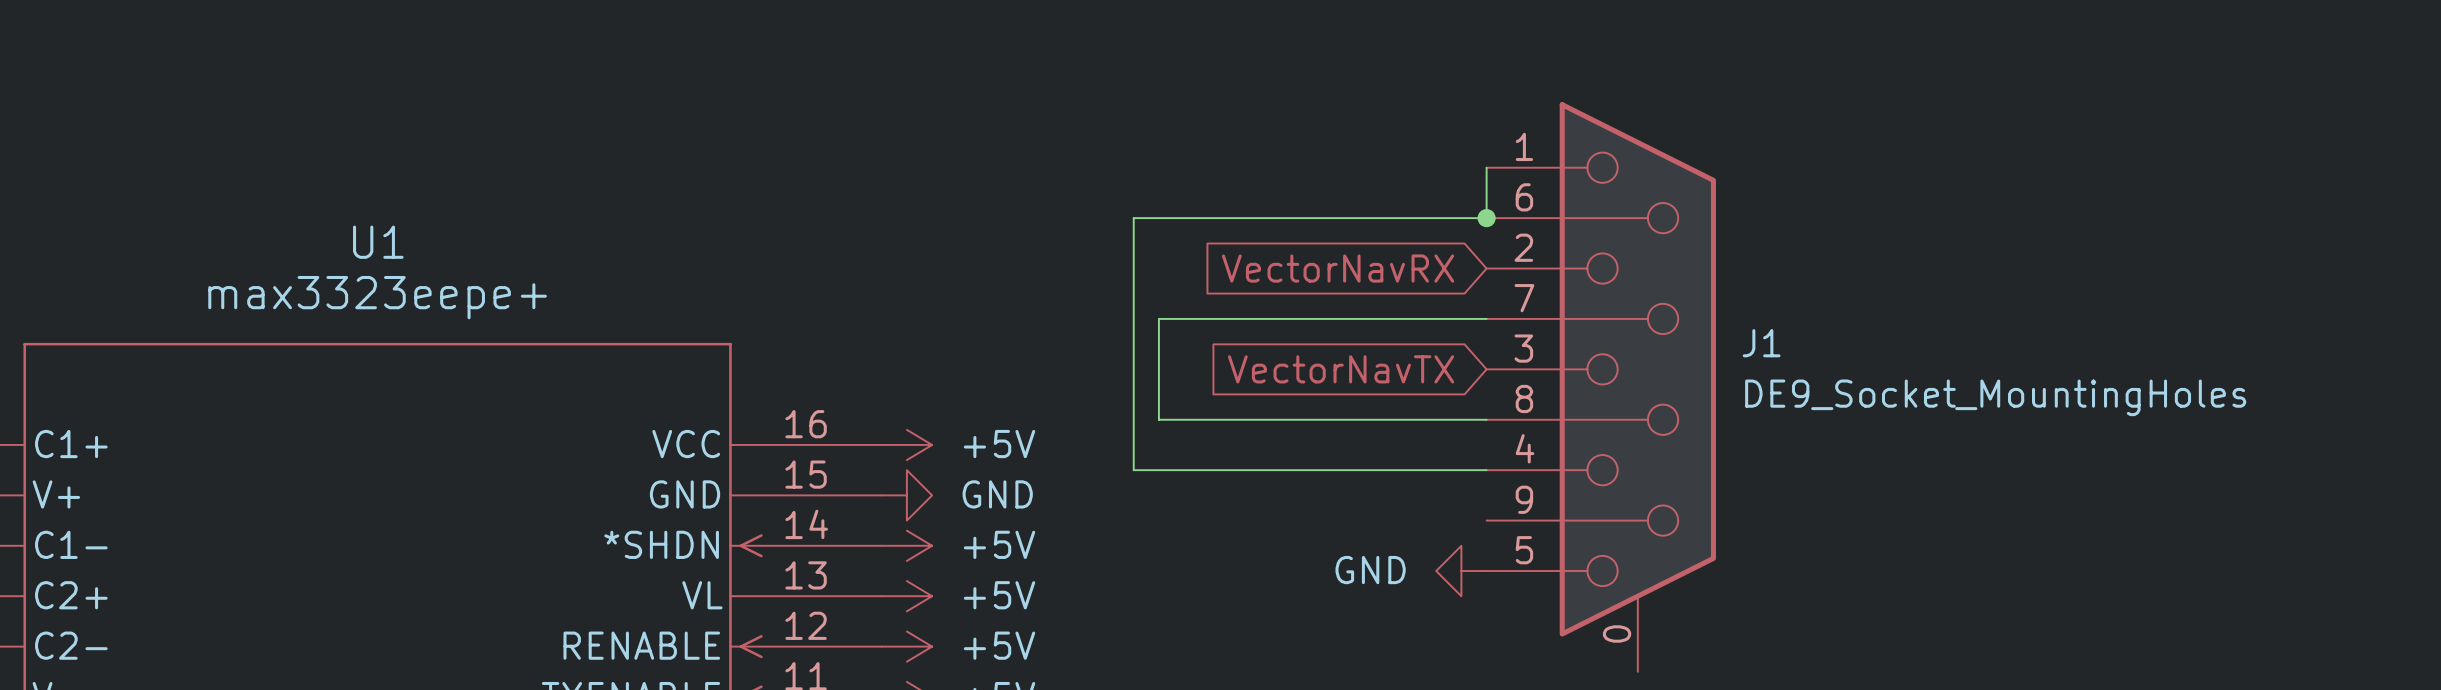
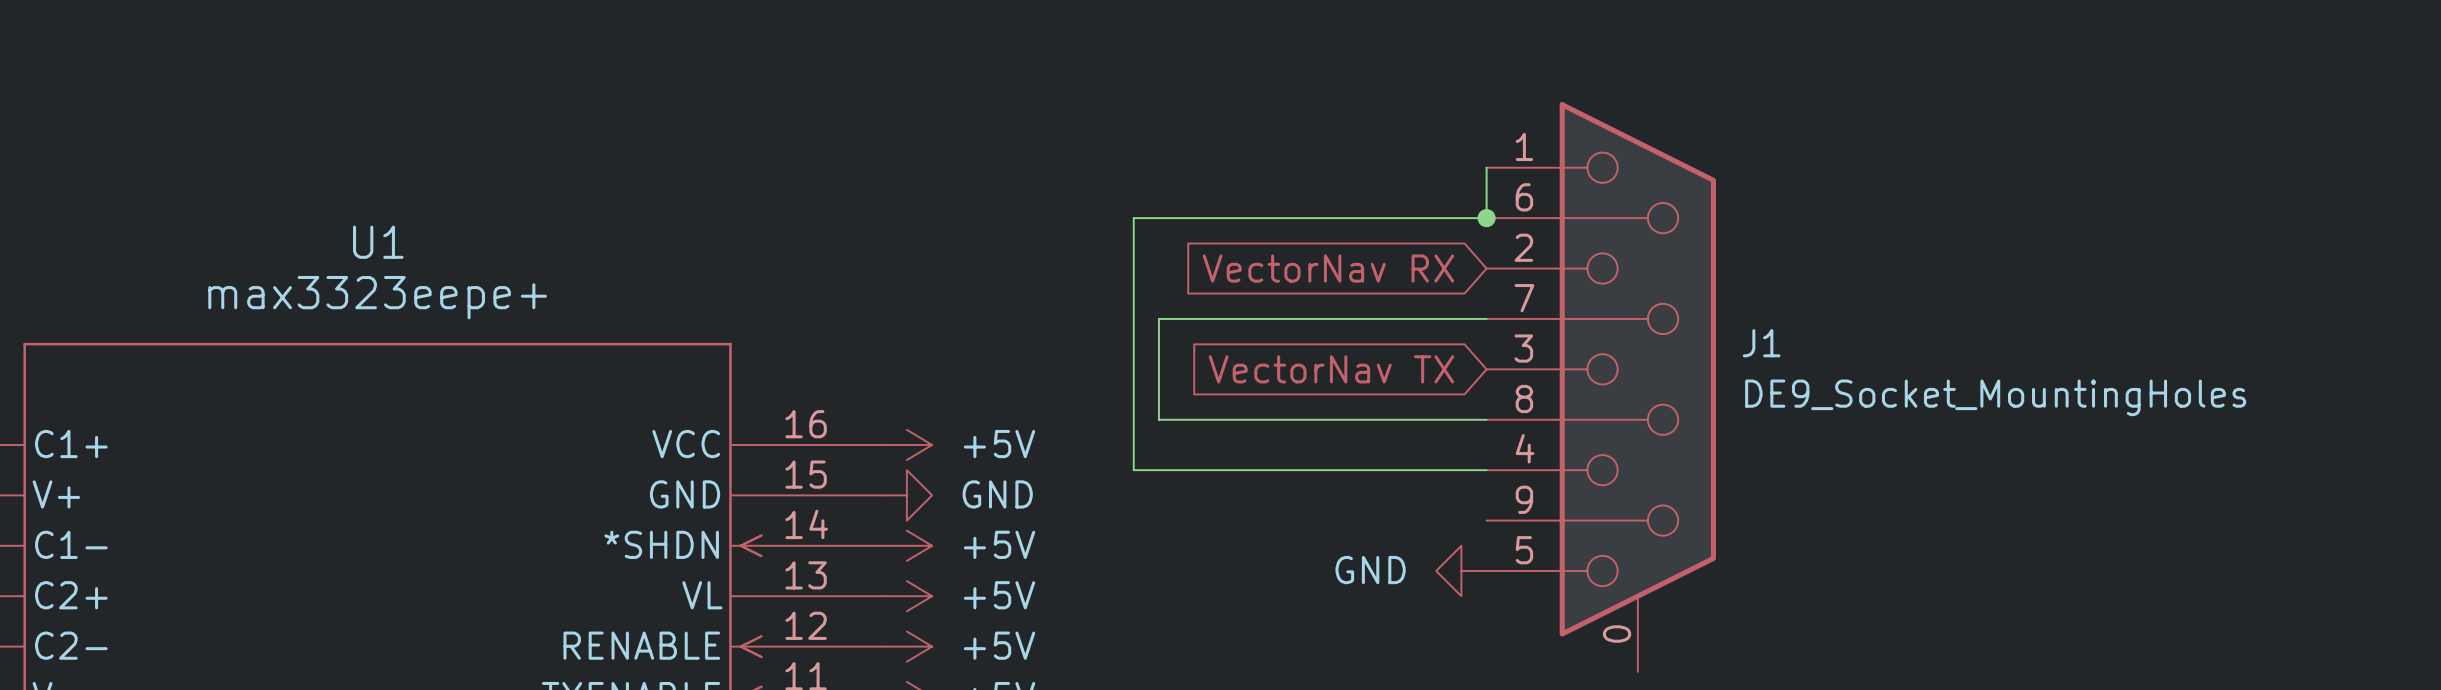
global label: VectorNavRX (1338, 268) -> VectorNav RX (1328, 268)
global label: VectorNavTX (1341, 369) -> VectorNav TX (1331, 369)

